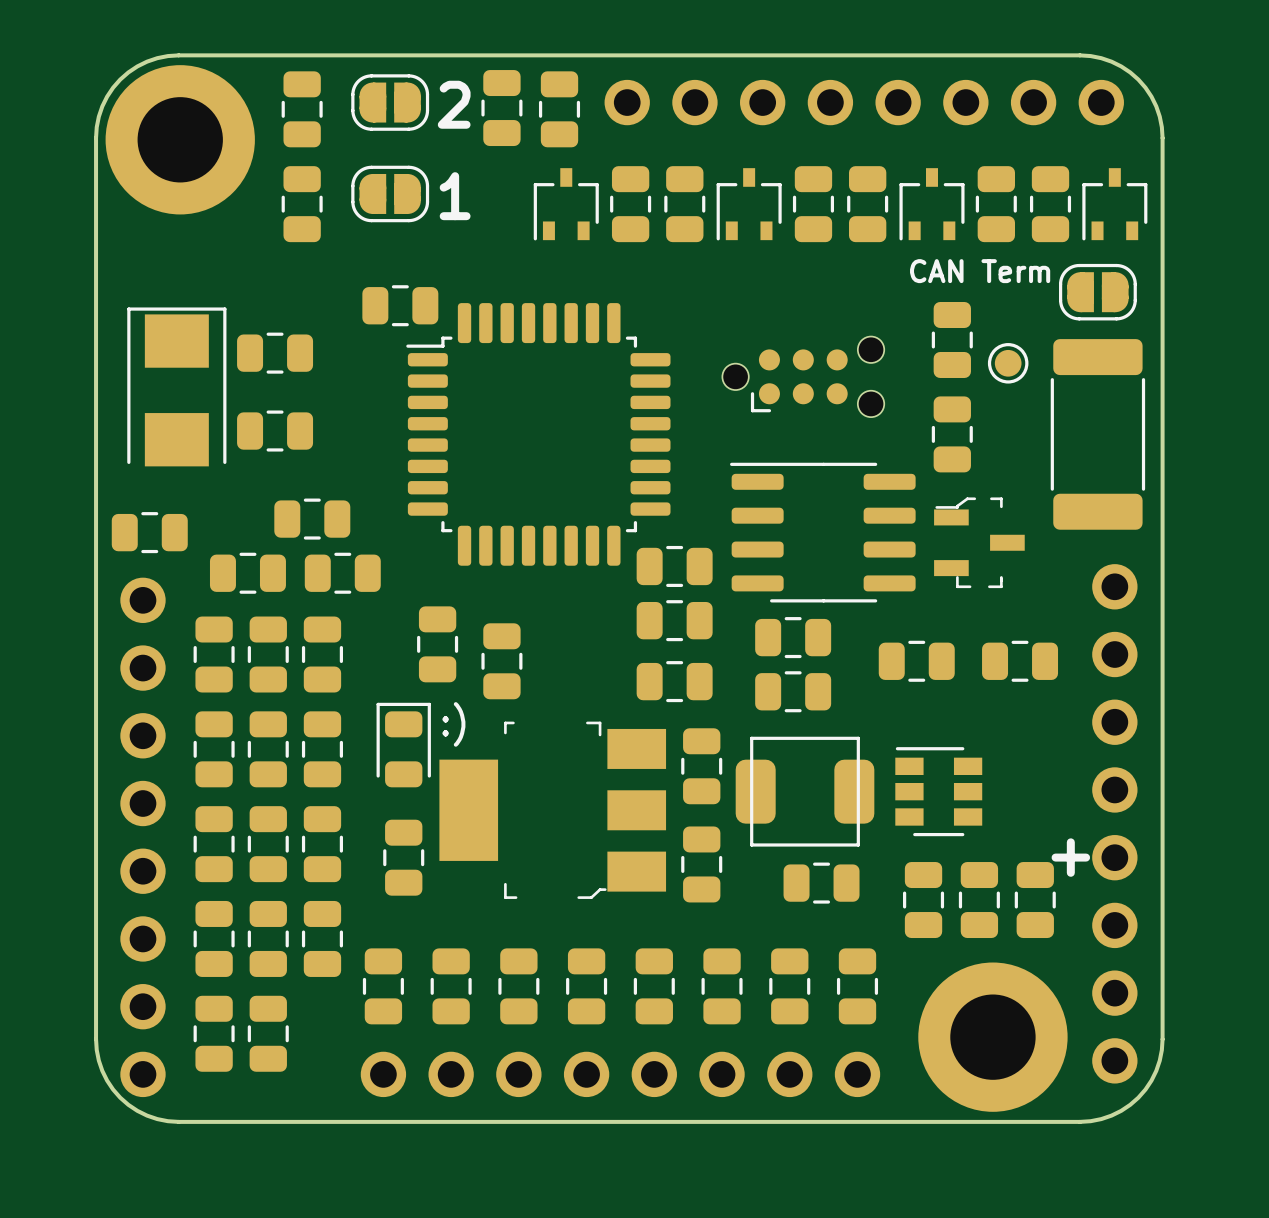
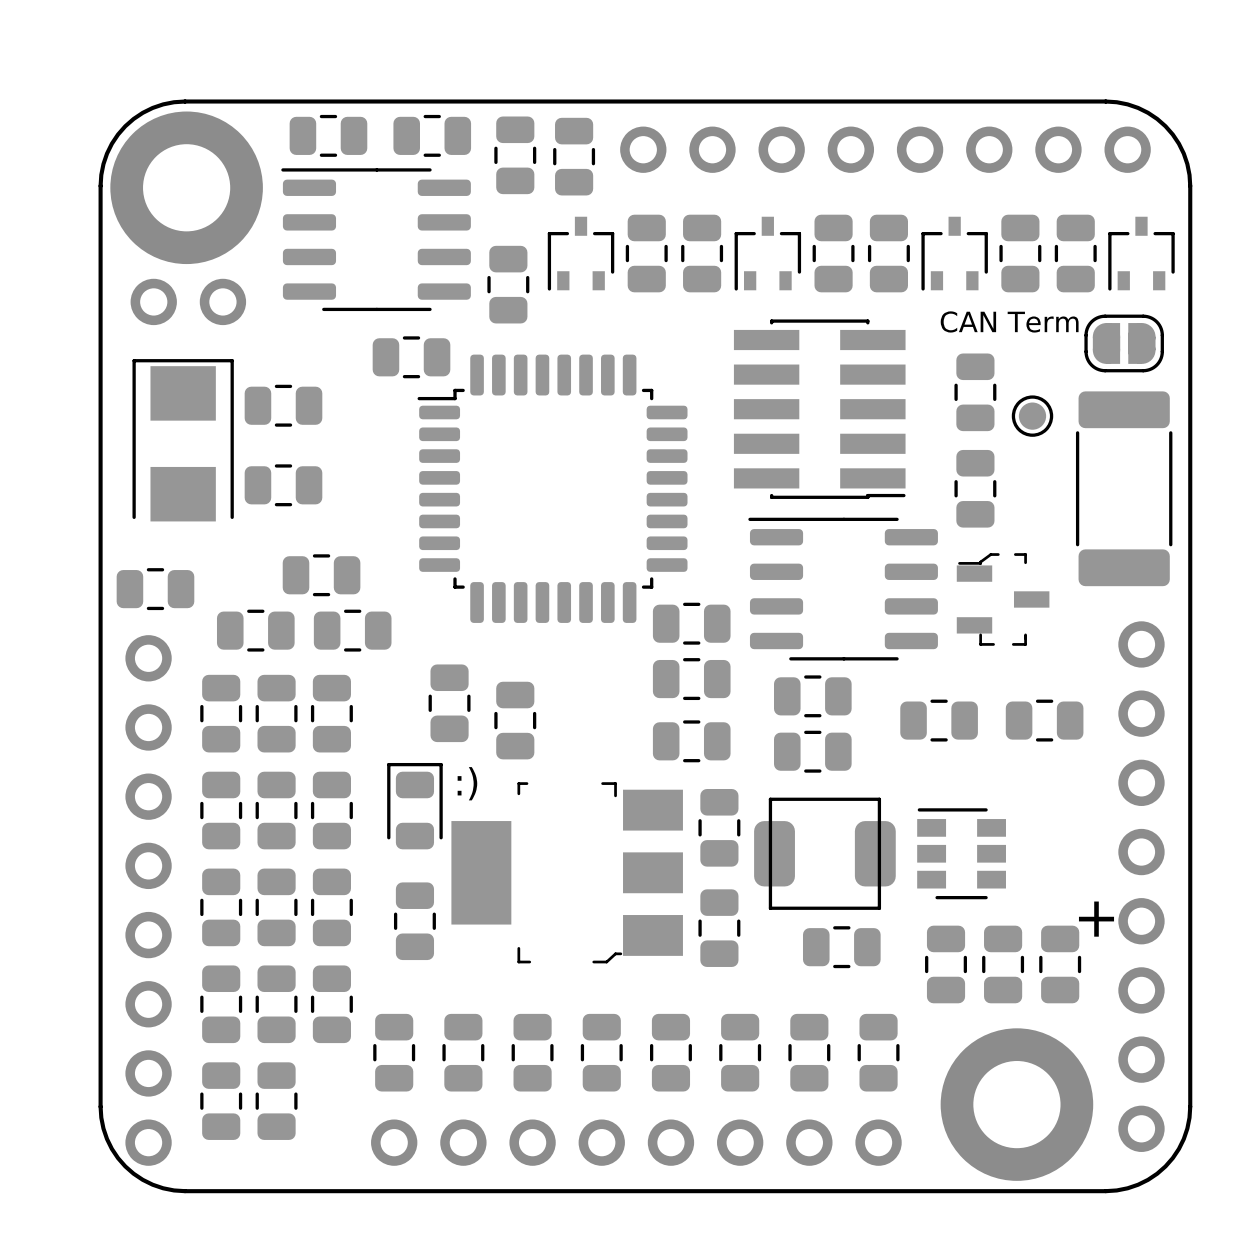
part: none -> (432, 135)
part: (390, 102) -> none
text: 2 (454, 104) -> none
part rotation: 0° (302, 109) -> 90° clockwise (328, 135)
part footprint: [351, 165, 430, 223] -> [281, 168, 471, 312]
text: 1 (455, 196) -> none
part: (302, 204) -> none
part: none -> (508, 284)
part: none -> (188, 301)
part footprint: [722, 336, 885, 418] -> [733, 319, 906, 499]

